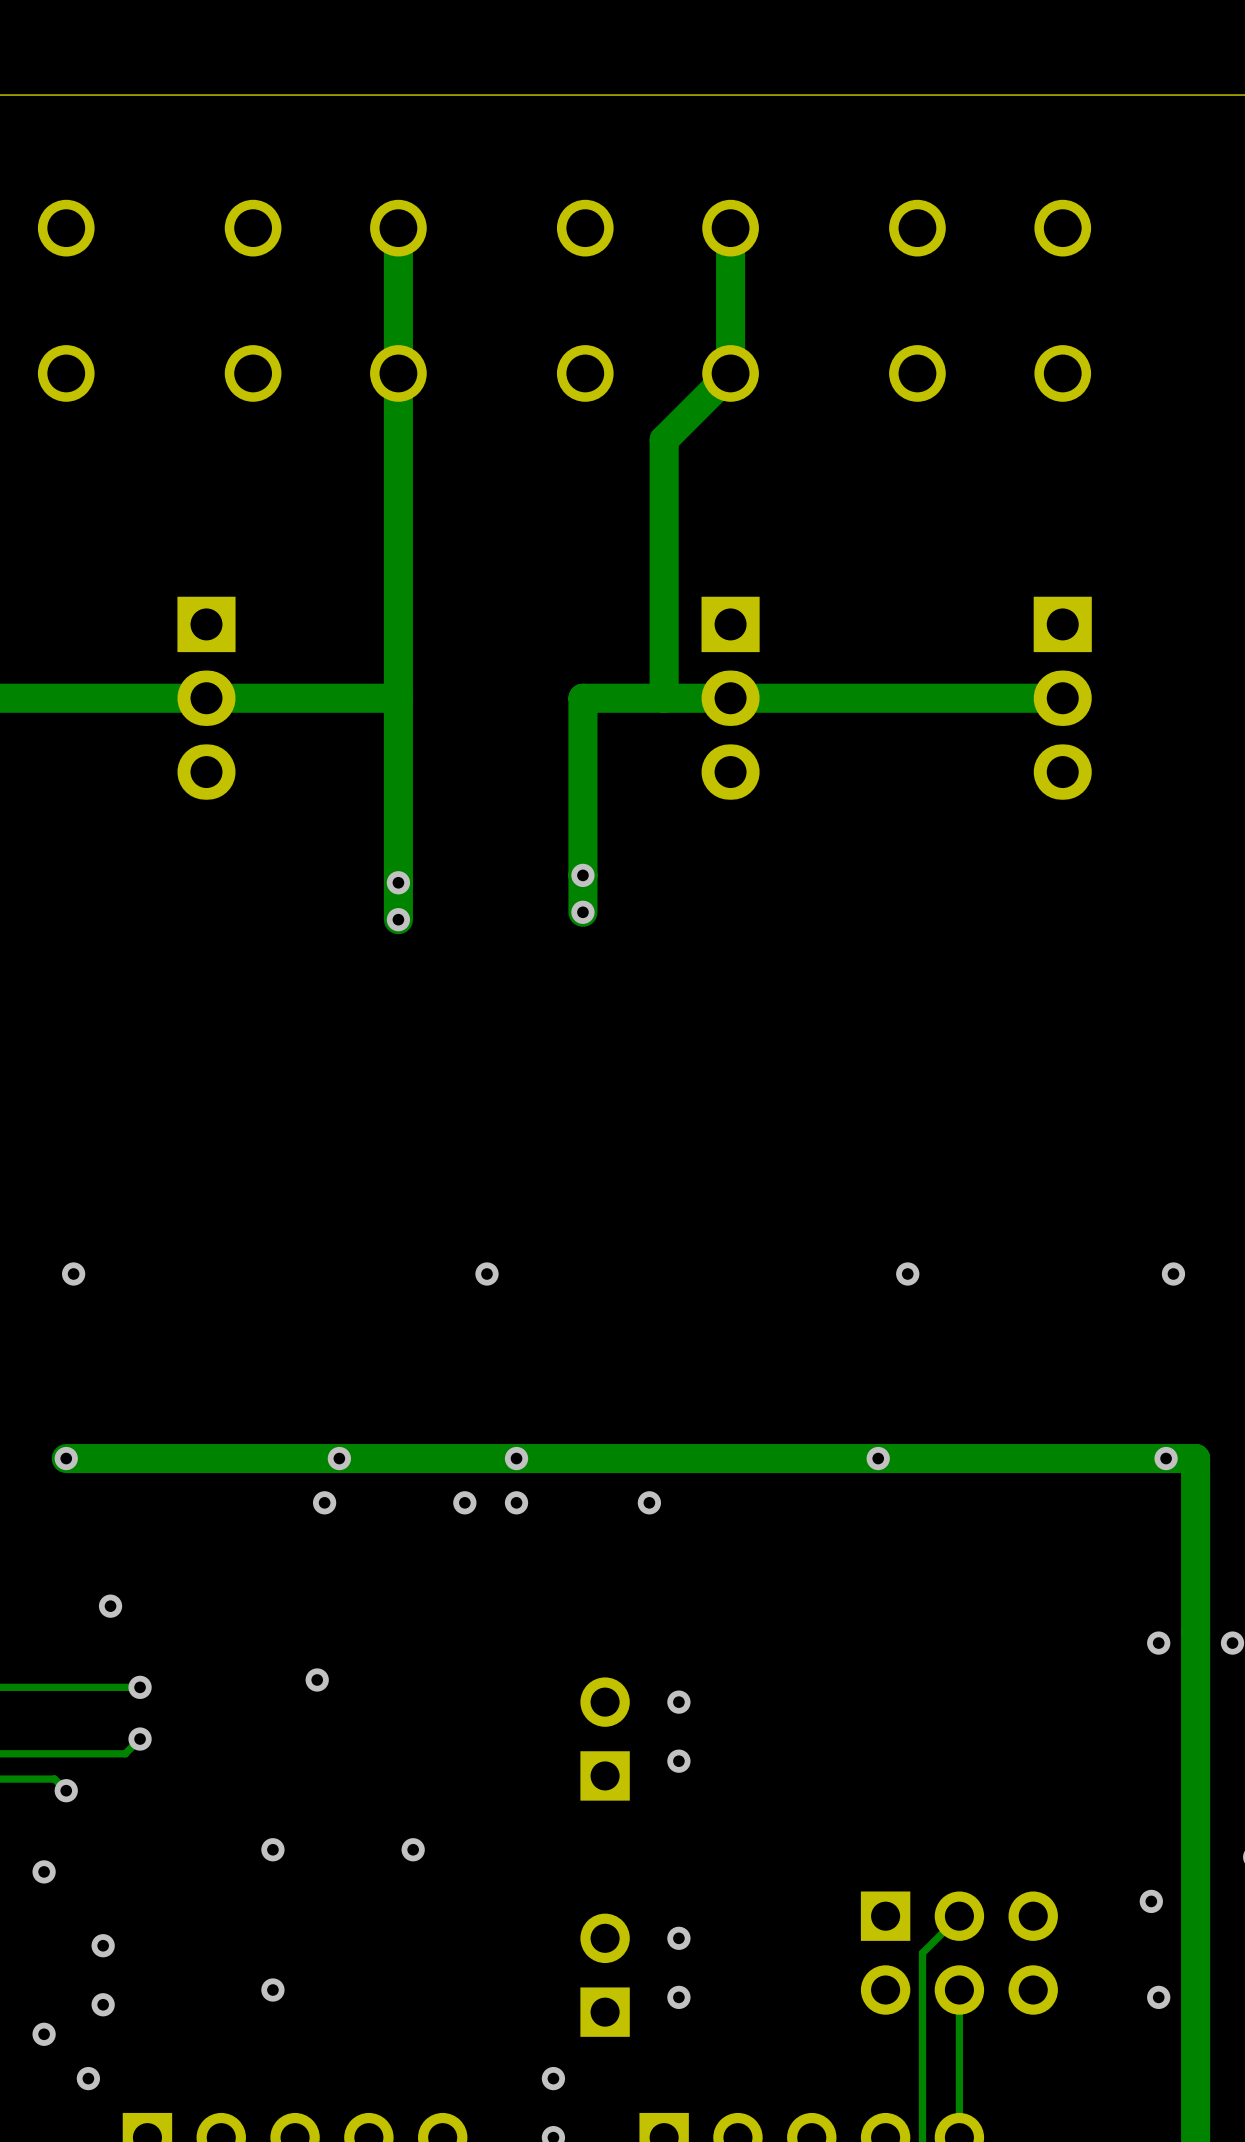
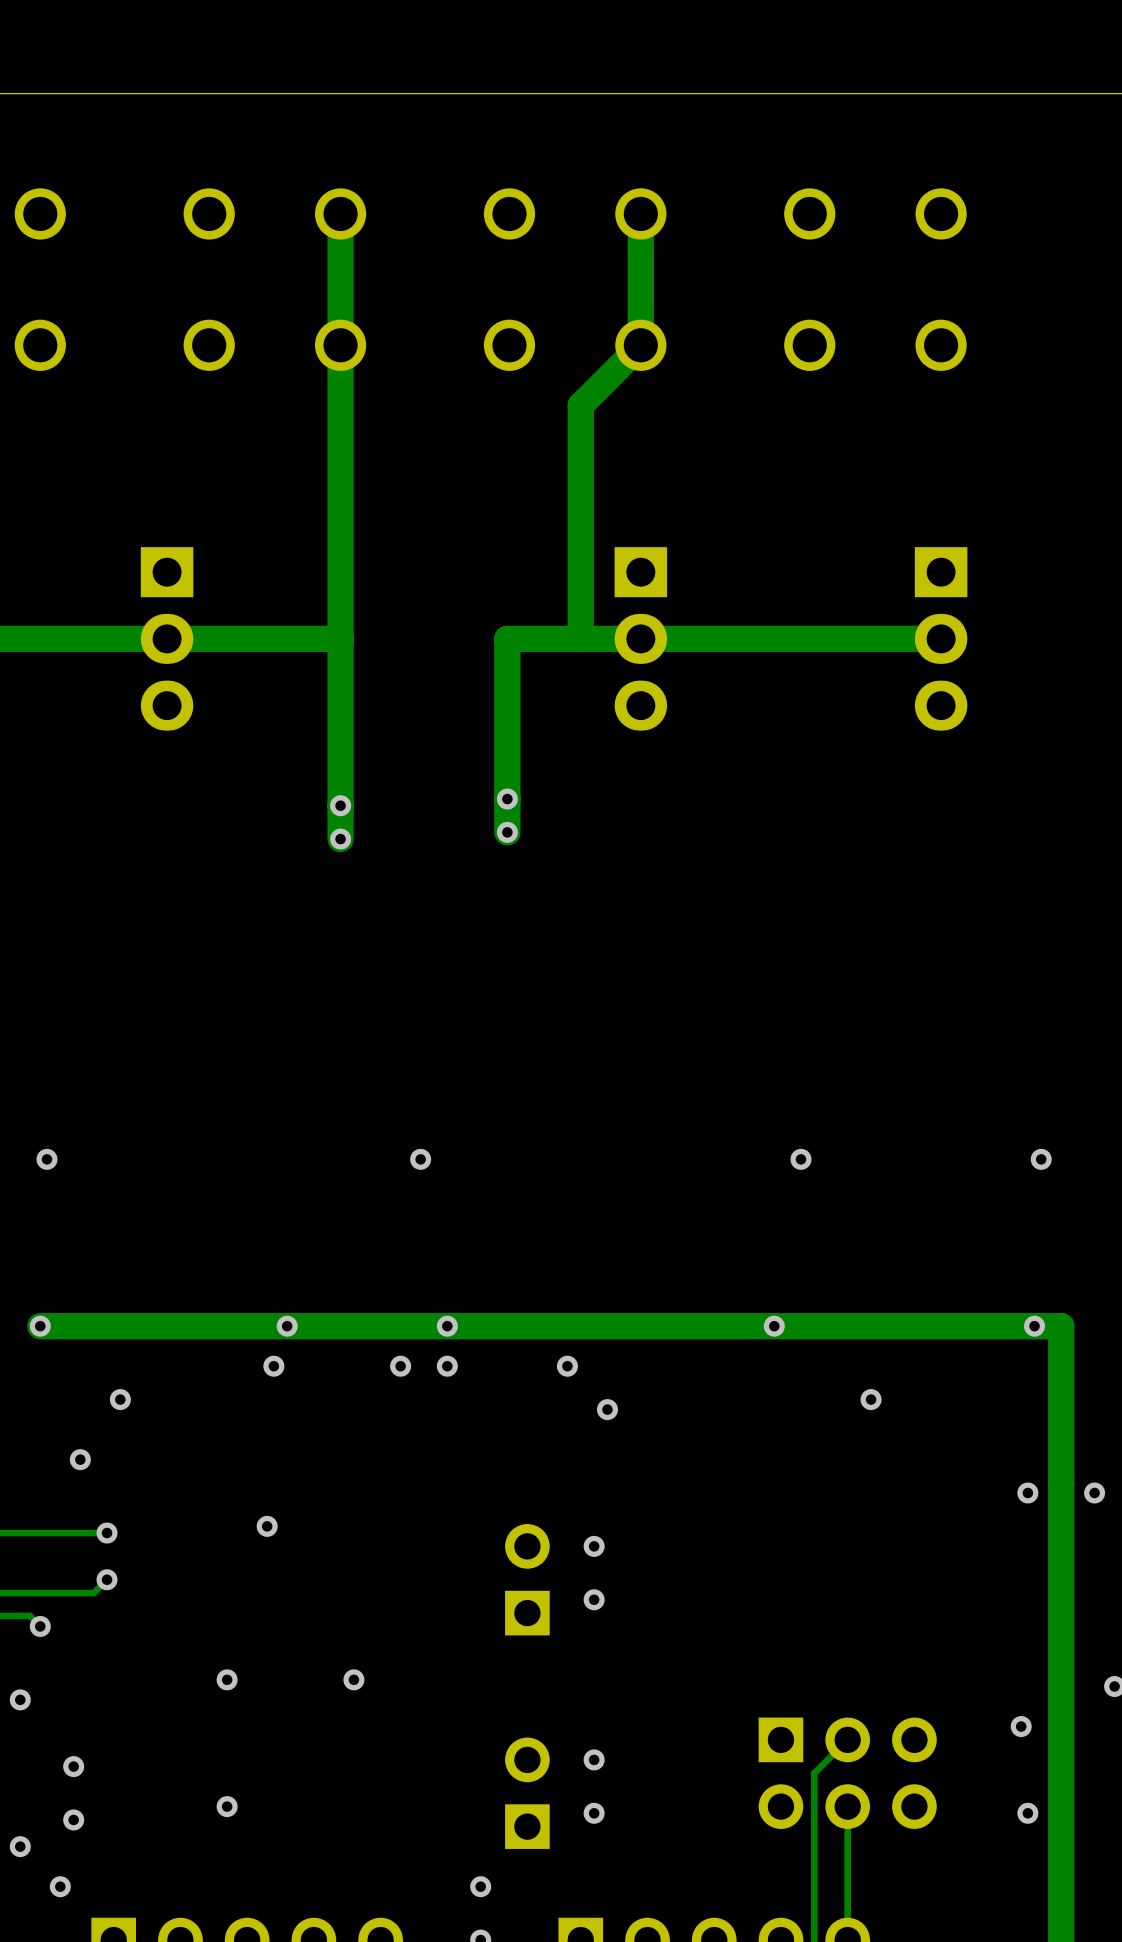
via: none -> (120, 1399)
via: none -> (871, 1399)
via: none -> (607, 1409)

